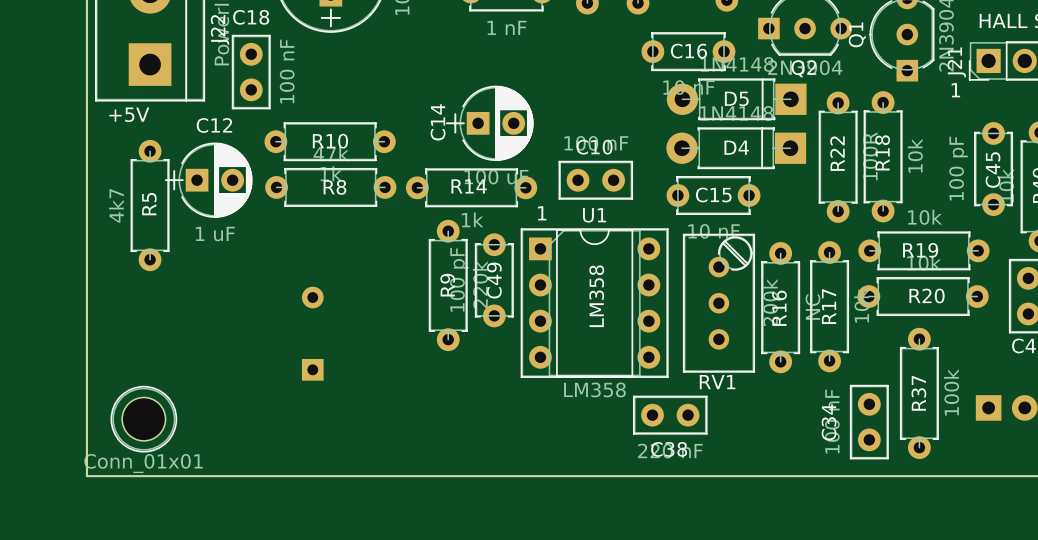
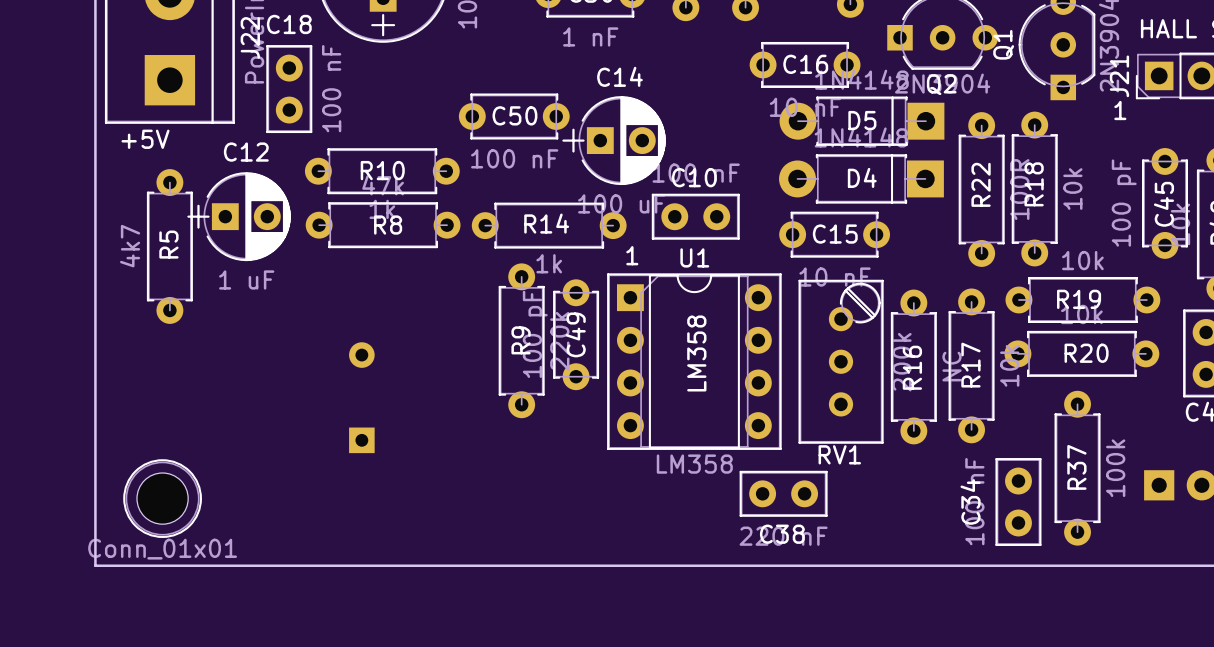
C50: none -> 100 nF (514, 116)
C14 name rotation: 0° (438, 122) -> 90° clockwise (619, 76)
C14 name position: C14 (438, 122) -> C14 (619, 76)
C14 position: (489, 123) -> (614, 140)

